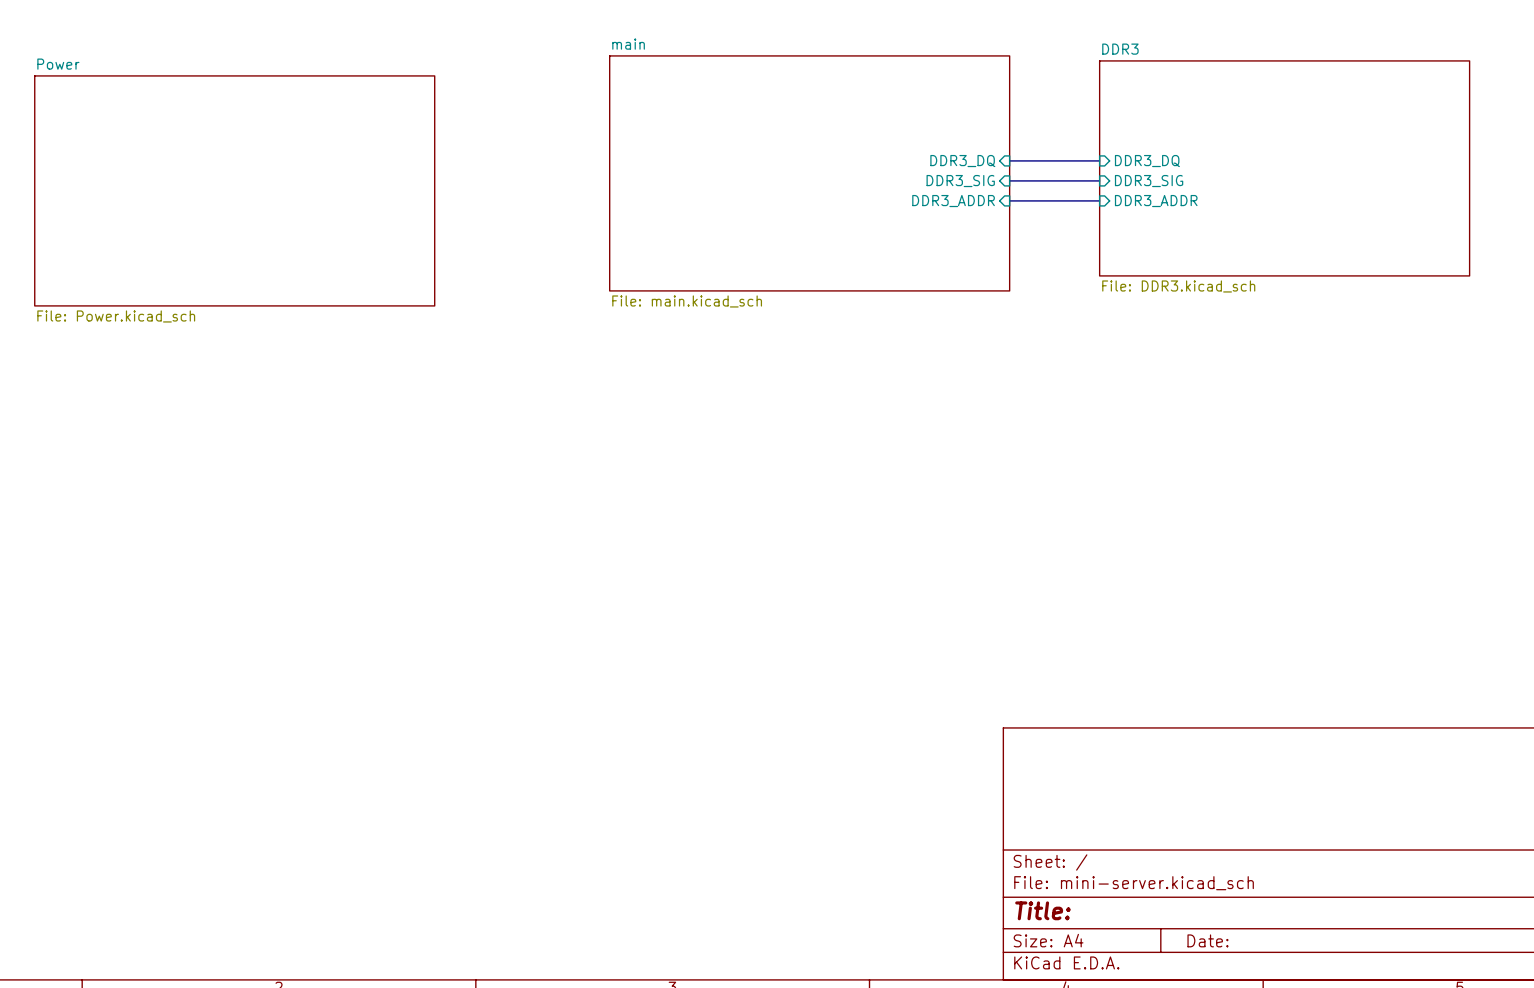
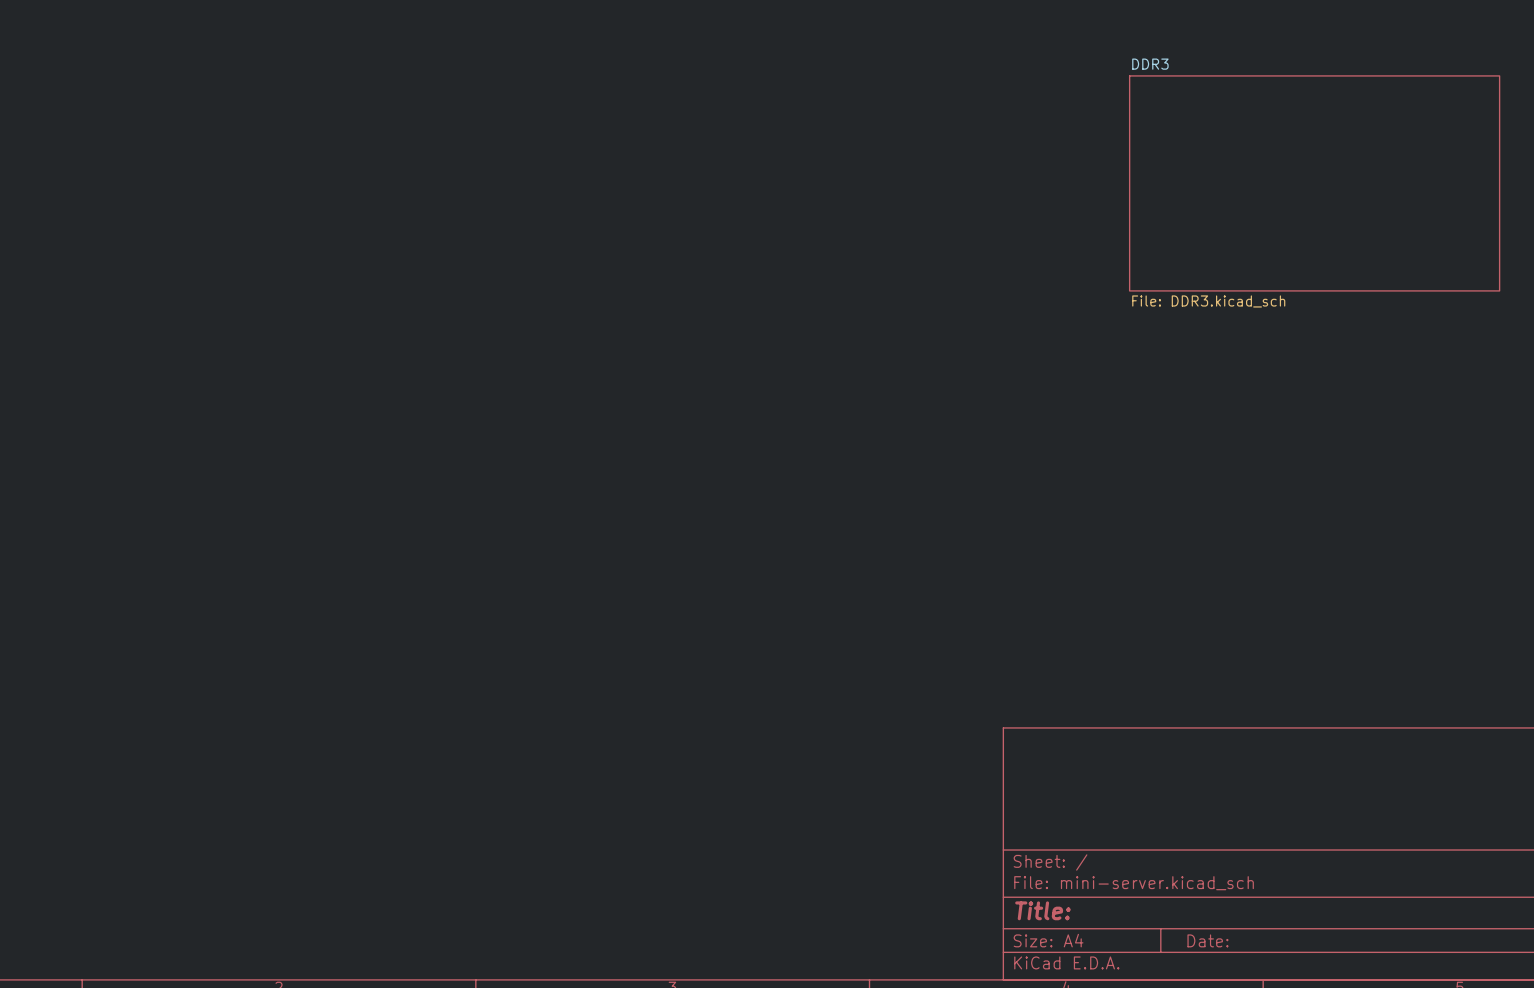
bus: (1009, 160) (1099, 160) -> none
sheet pin: DDR3_DQ (962, 161) -> none
sheet pin: DDR3_DQ (1147, 161) -> none
sheet DDR3 position: (1284, 168) -> (1314, 183)
sheet main: File: main.kicad_sch (809, 173) -> none
bus: (1009, 180) (1099, 180) -> none
sheet pin: DDR3_SIG (960, 181) -> none
sheet pin: DDR3_SIG (1149, 181) -> none
sheet Power: File: Power.kicad_sch (234, 190) -> none
bus: (1009, 200) (1099, 200) -> none
sheet pin: DDR3_ADDR (953, 201) -> none
sheet pin: DDR3_ADDR (1156, 201) -> none

